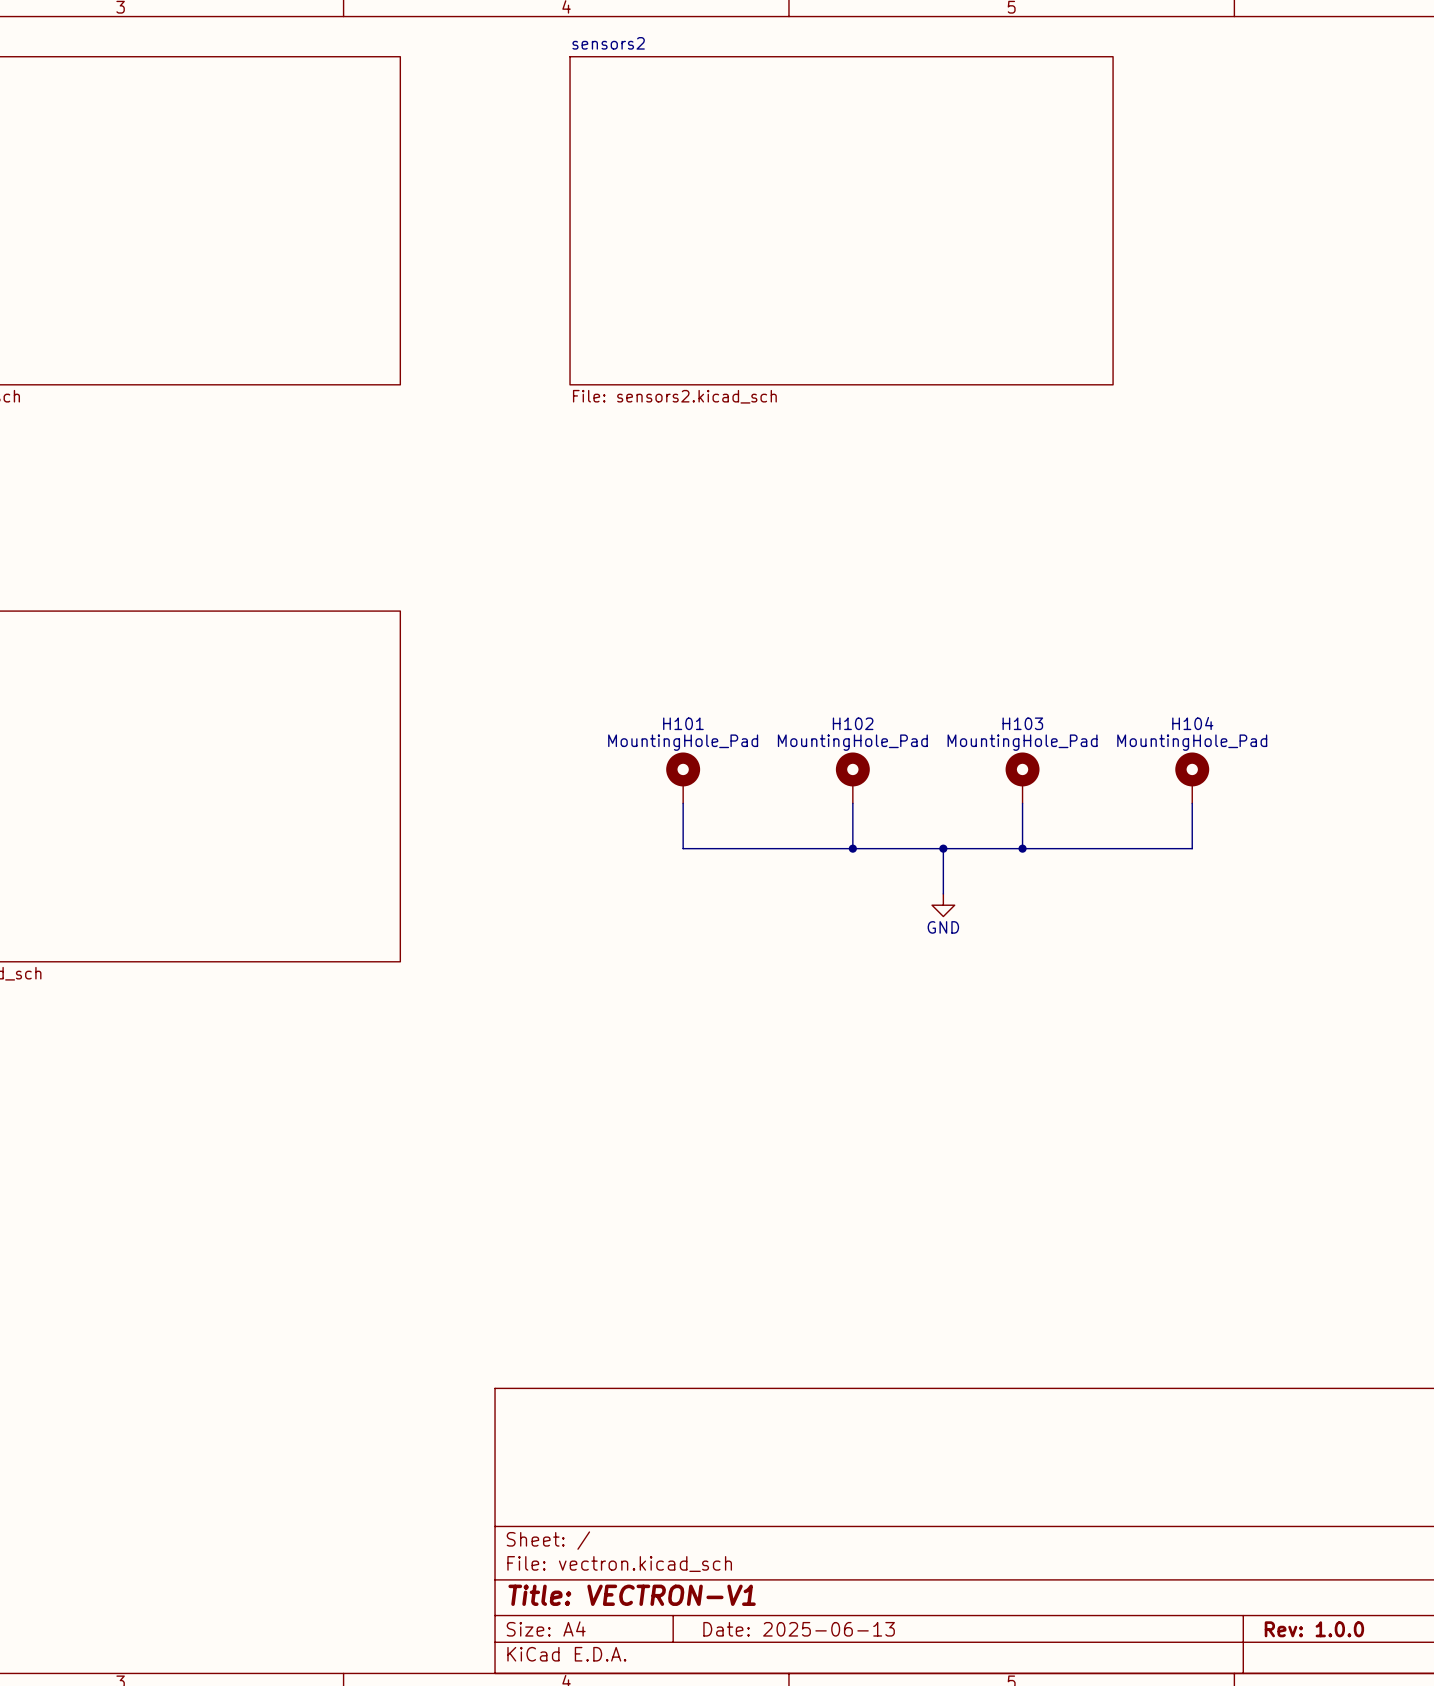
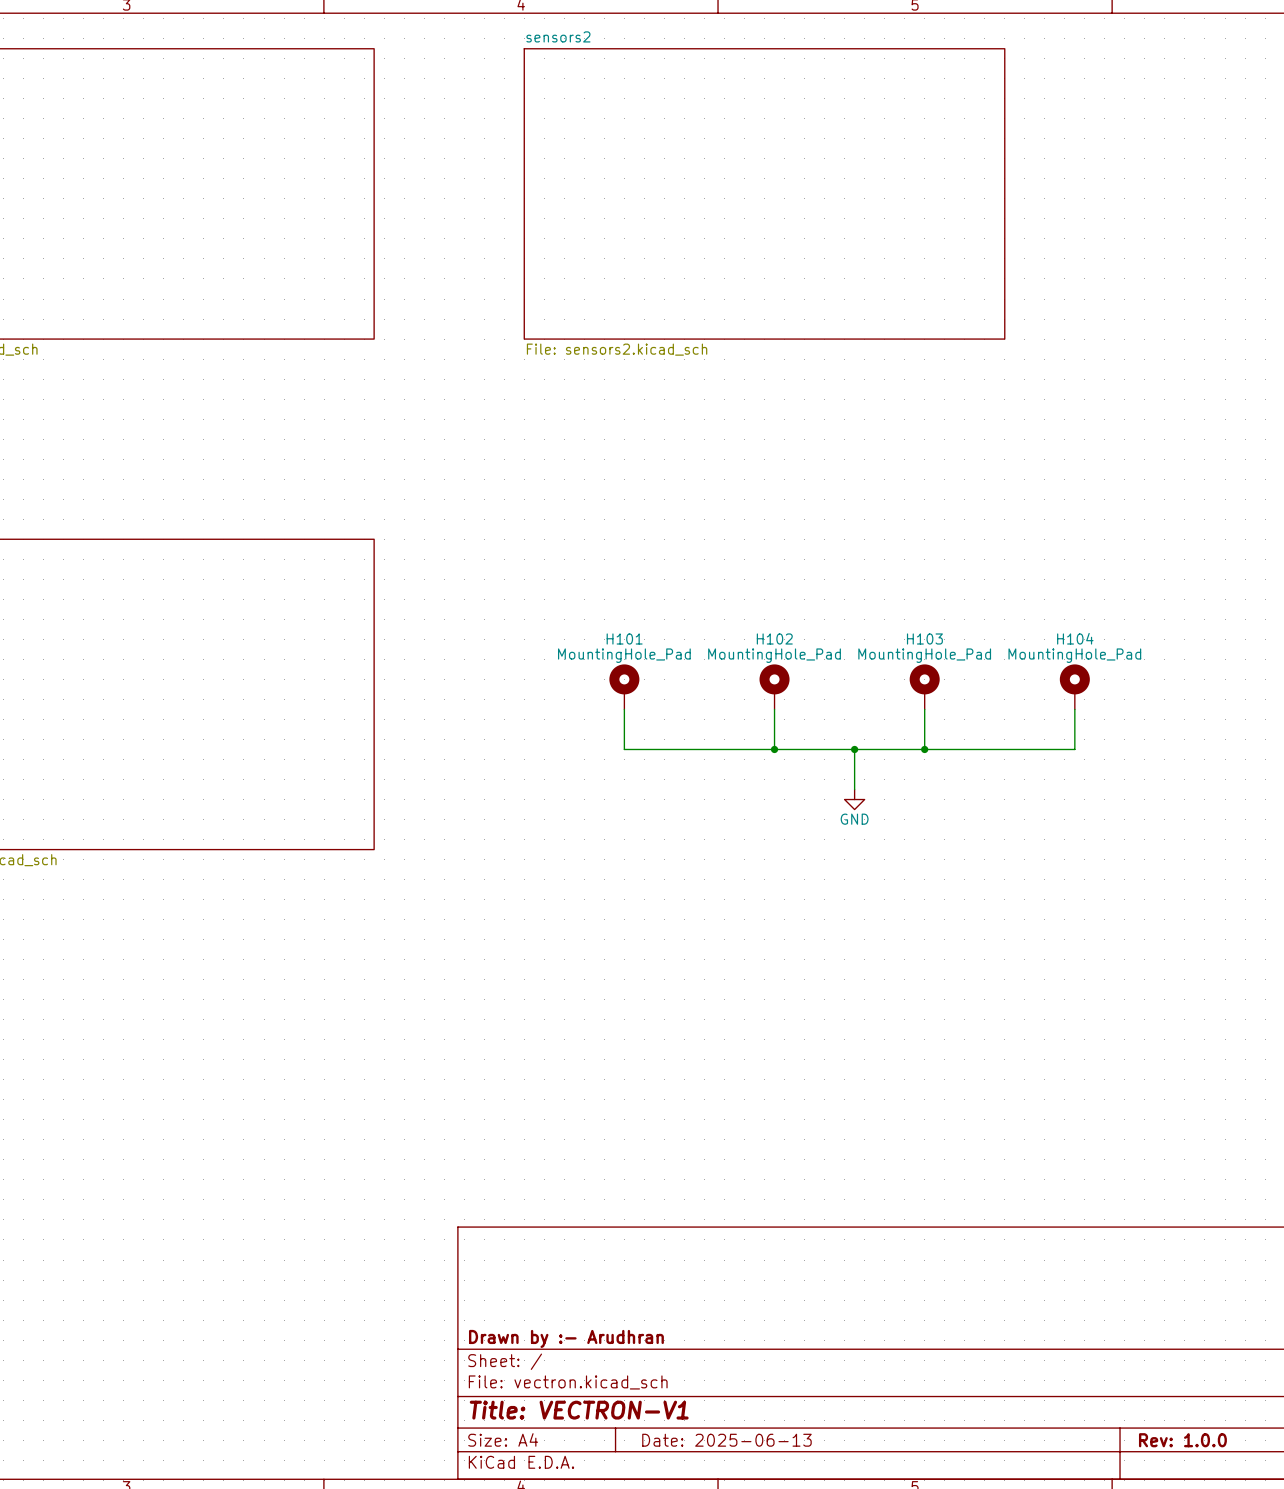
title block: none -> Drawn by :- Arudhran (566, 1338)

